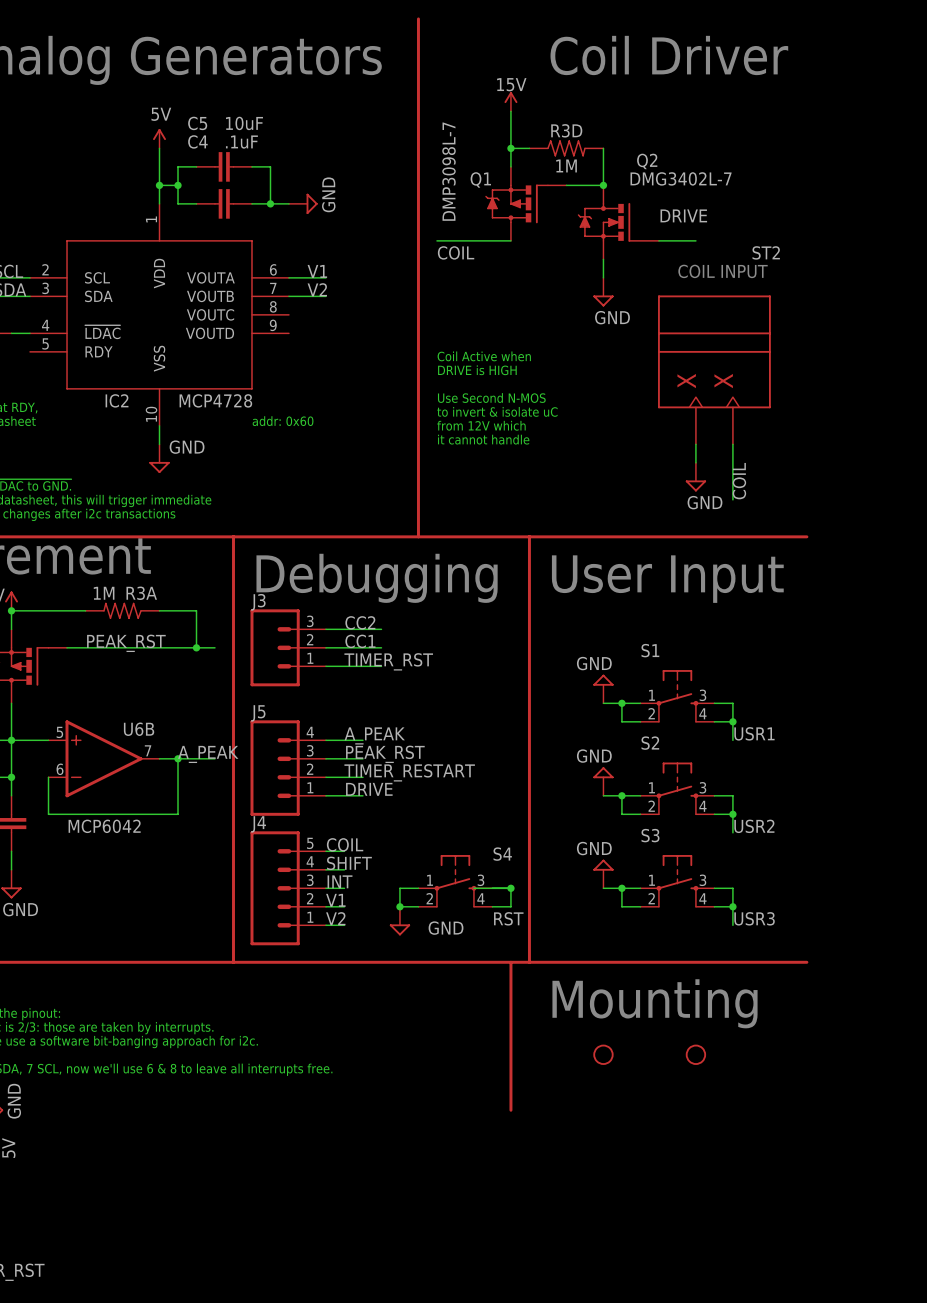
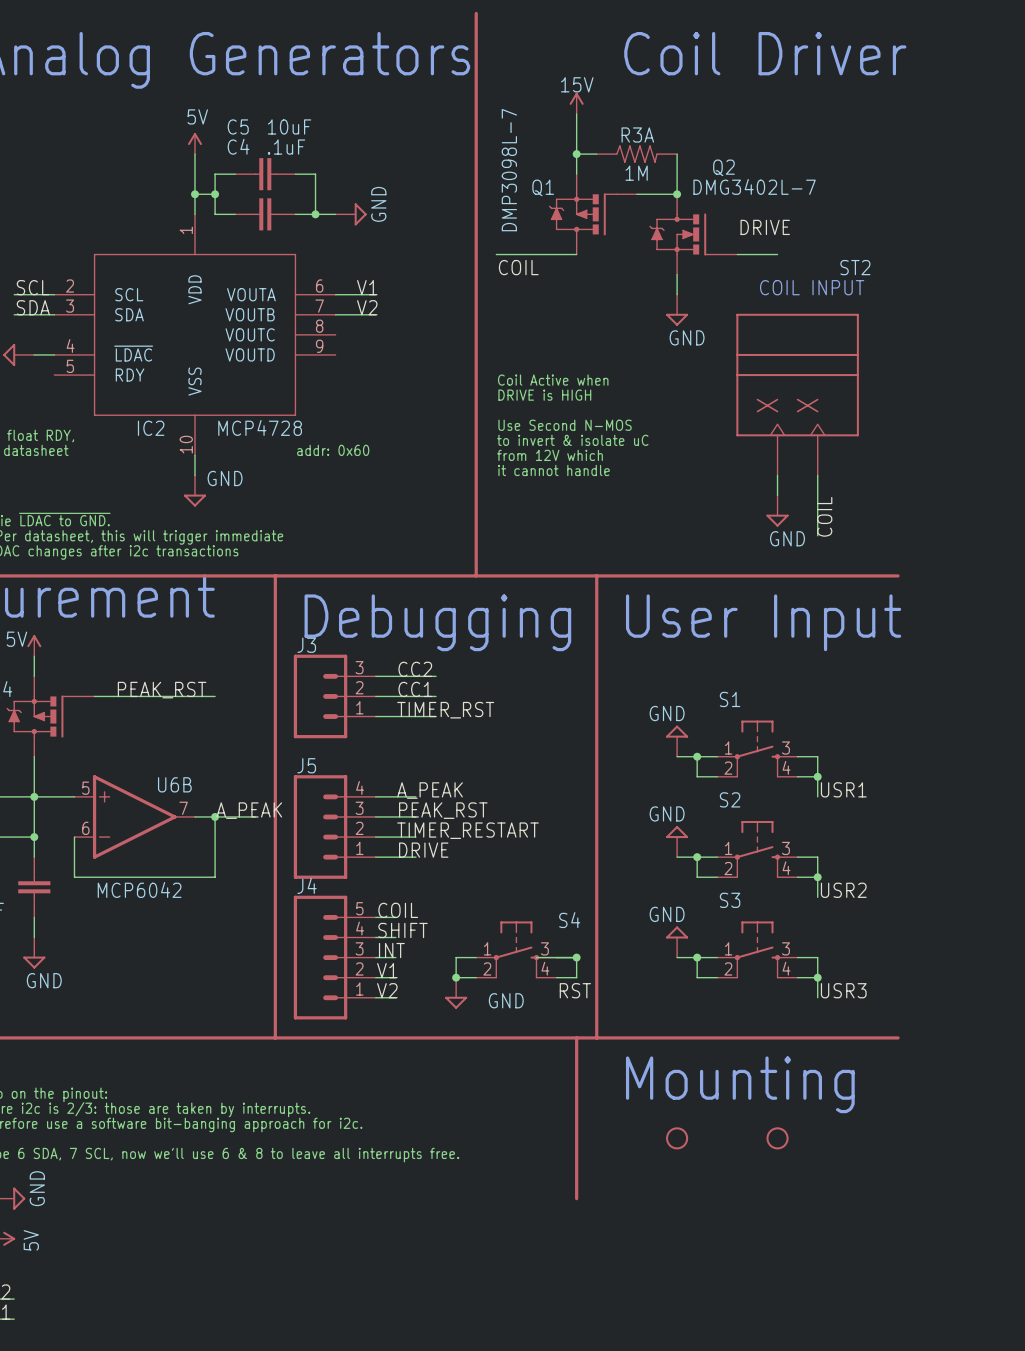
R3D name: R3D (566, 130) -> R3A (637, 135)
wire: (11, 610) (85, 610) -> none
junction: (11, 610) -> none
R3A: 1M (122, 610) -> none
wire: (159, 610) (196, 610) (196, 647) -> none
wire: (178, 647) (214, 647) -> none
junction: (196, 647) -> none

